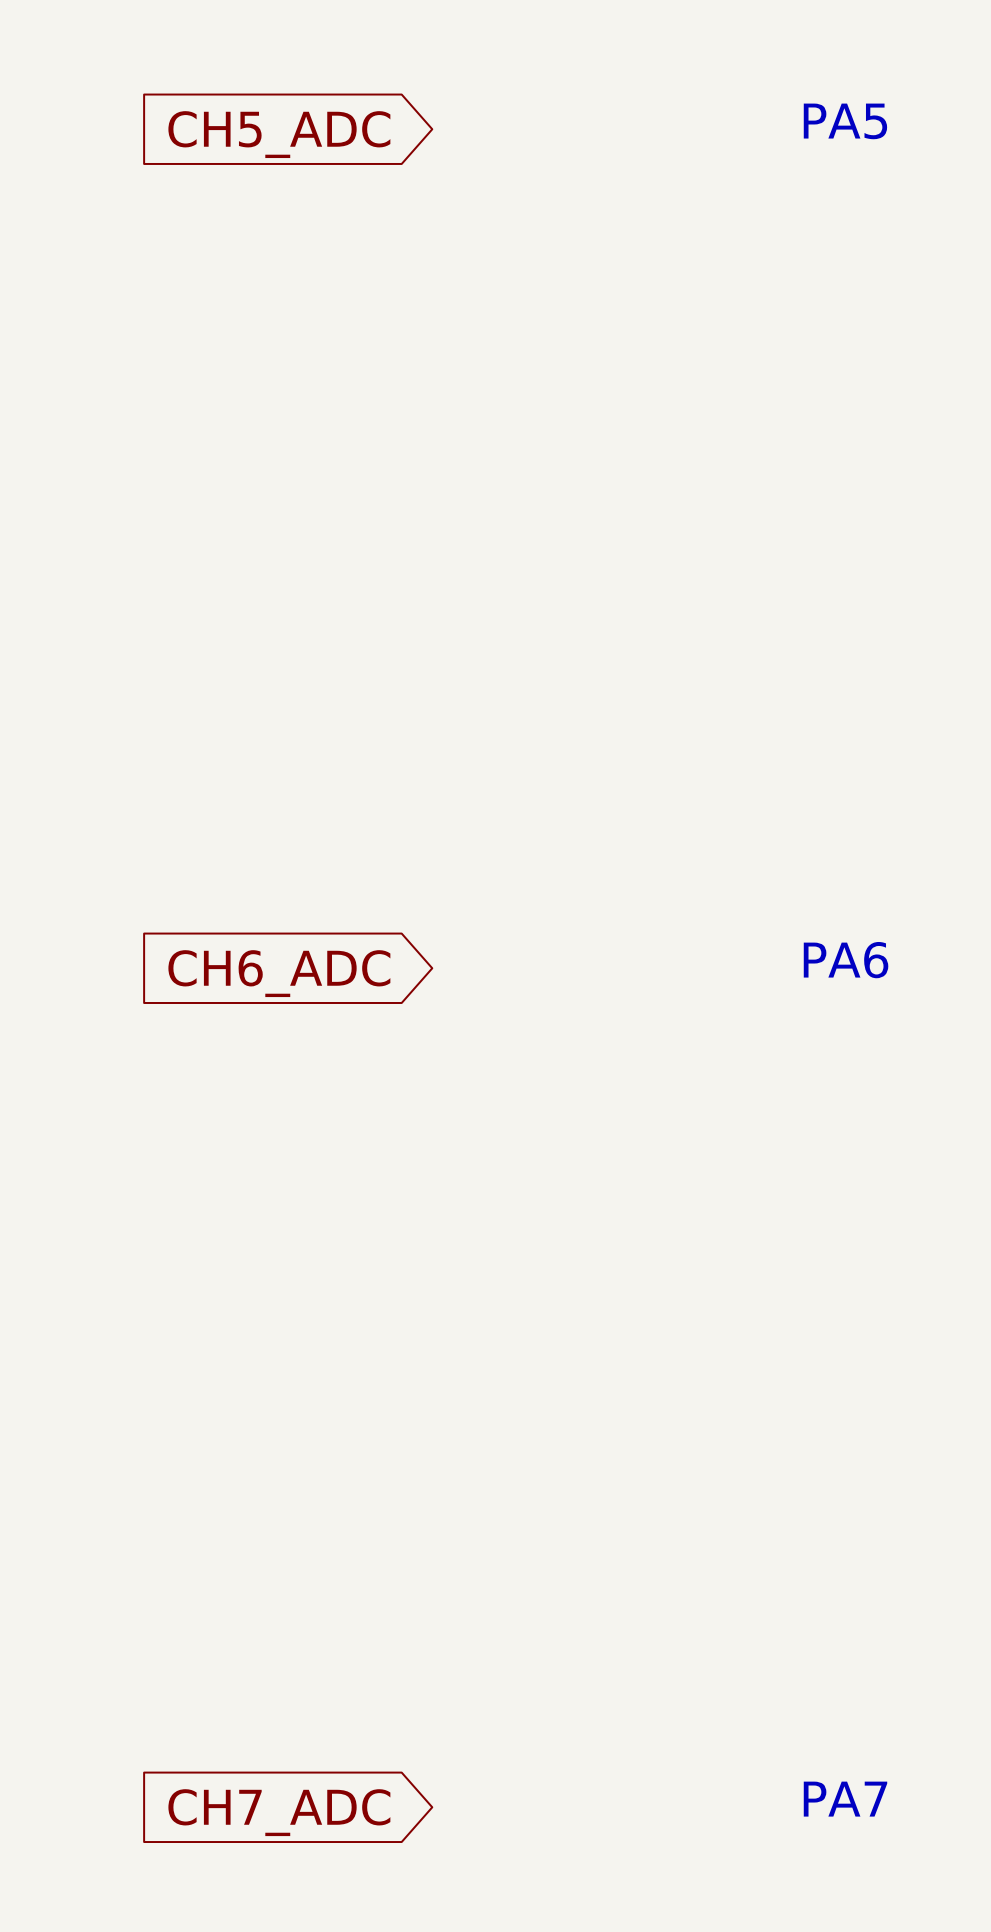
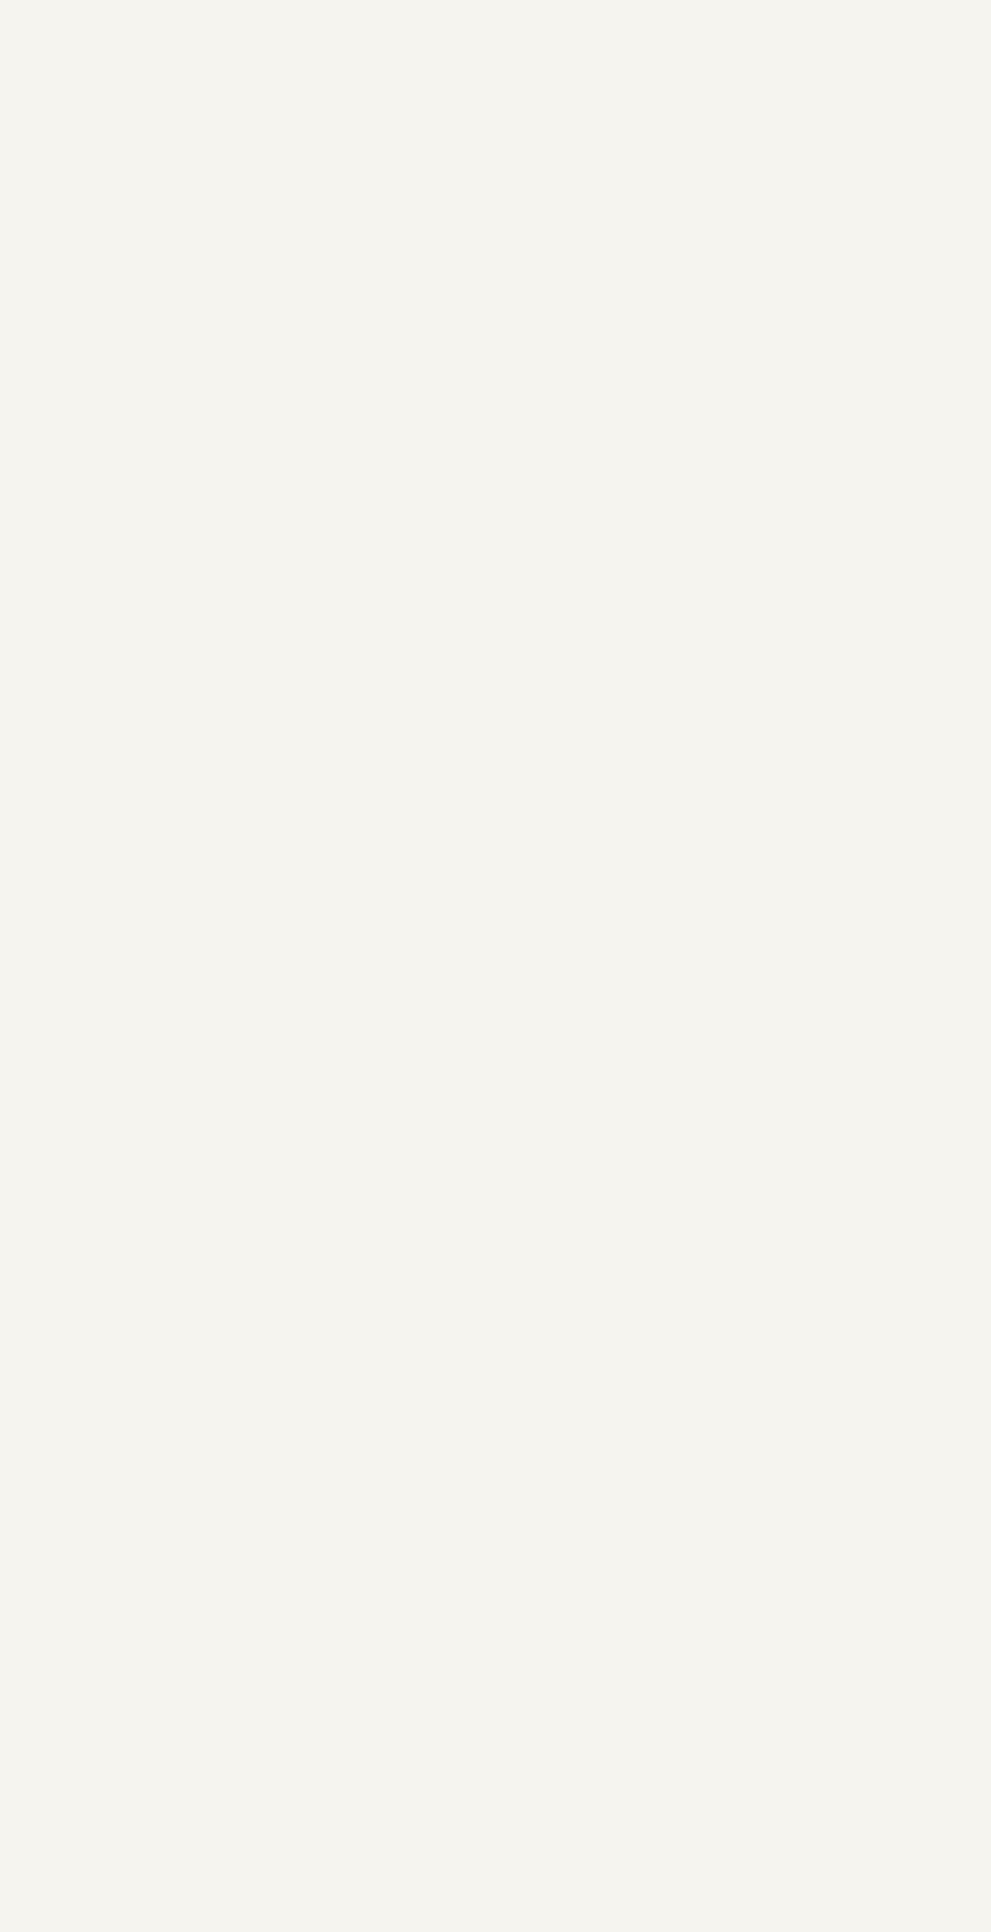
text: PA5 (845, 121) -> none
global label: CH5_ADC (279, 134) -> none
text: PA6 (846, 960) -> none
global label: CH6_ADC (279, 973) -> none
text: PA7 (845, 1799) -> none
global label: CH7_ADC (279, 1812) -> none

